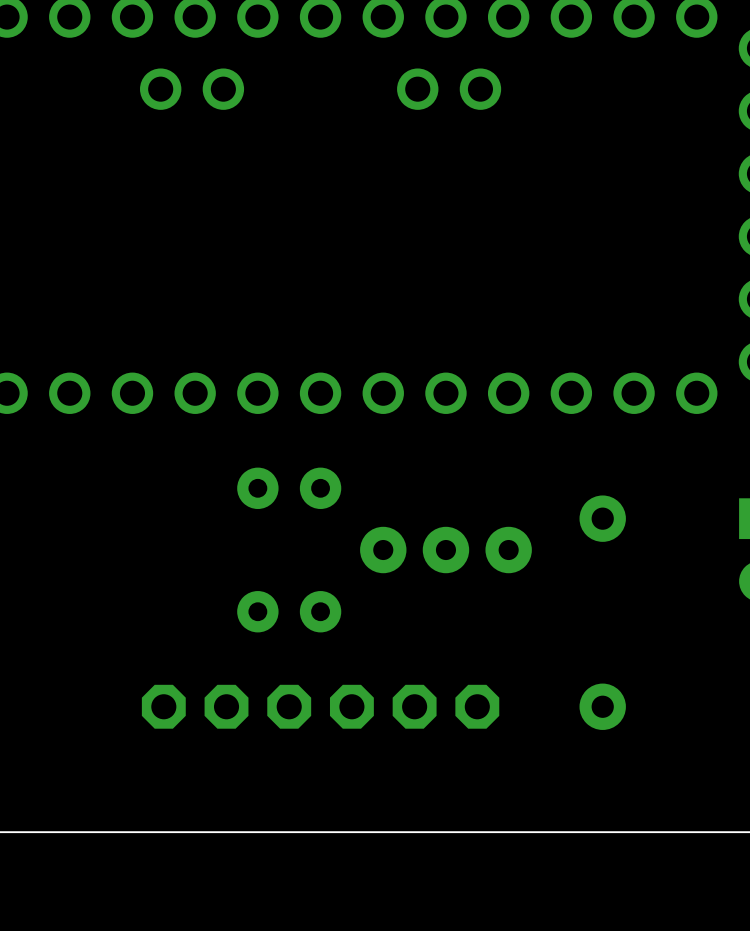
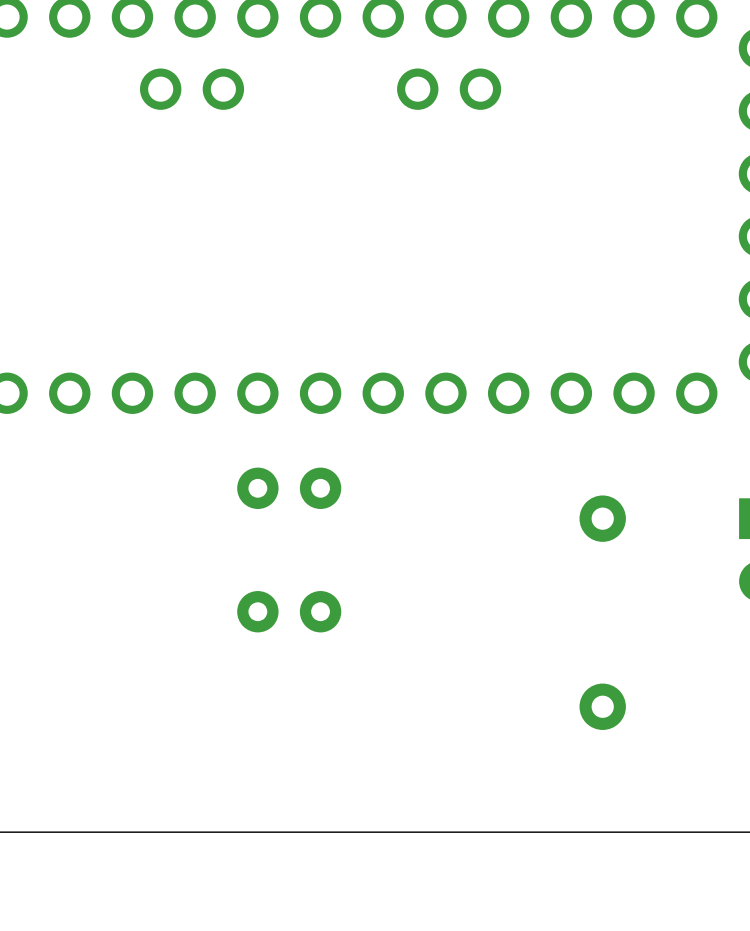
part: (445, 550) -> none
part: (320, 706) -> none

